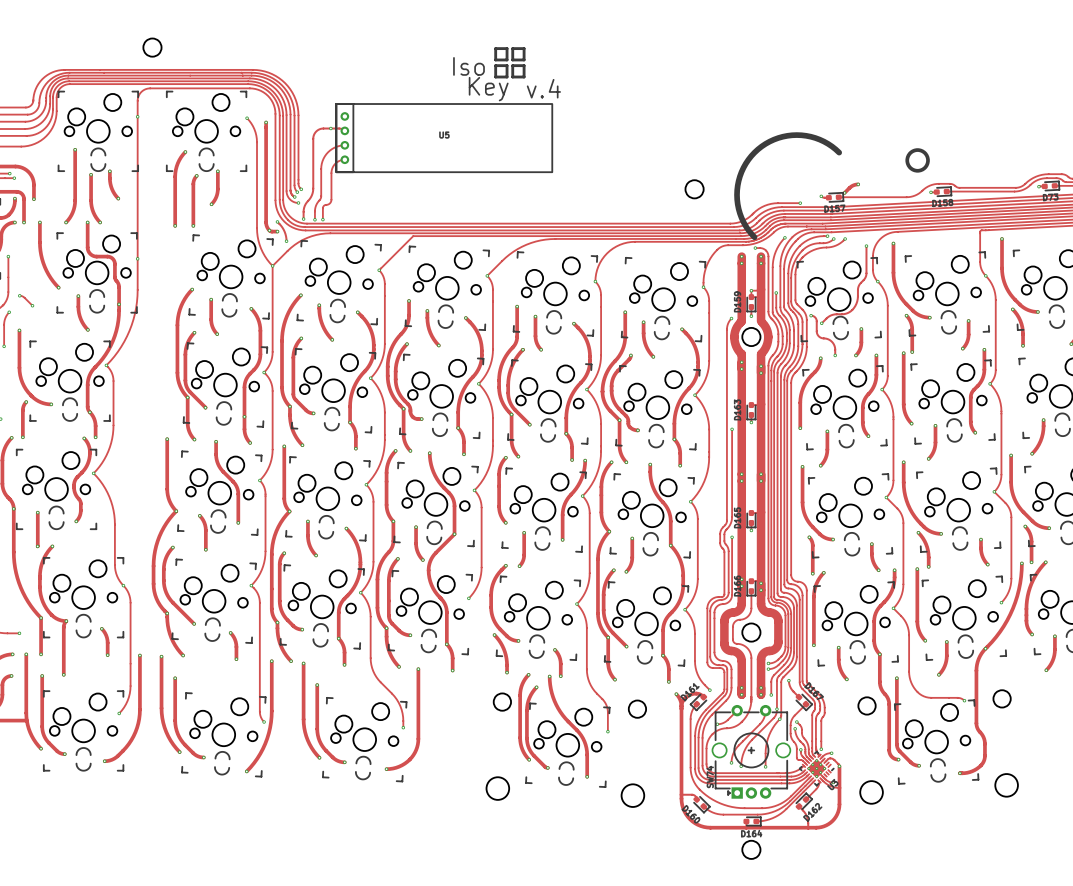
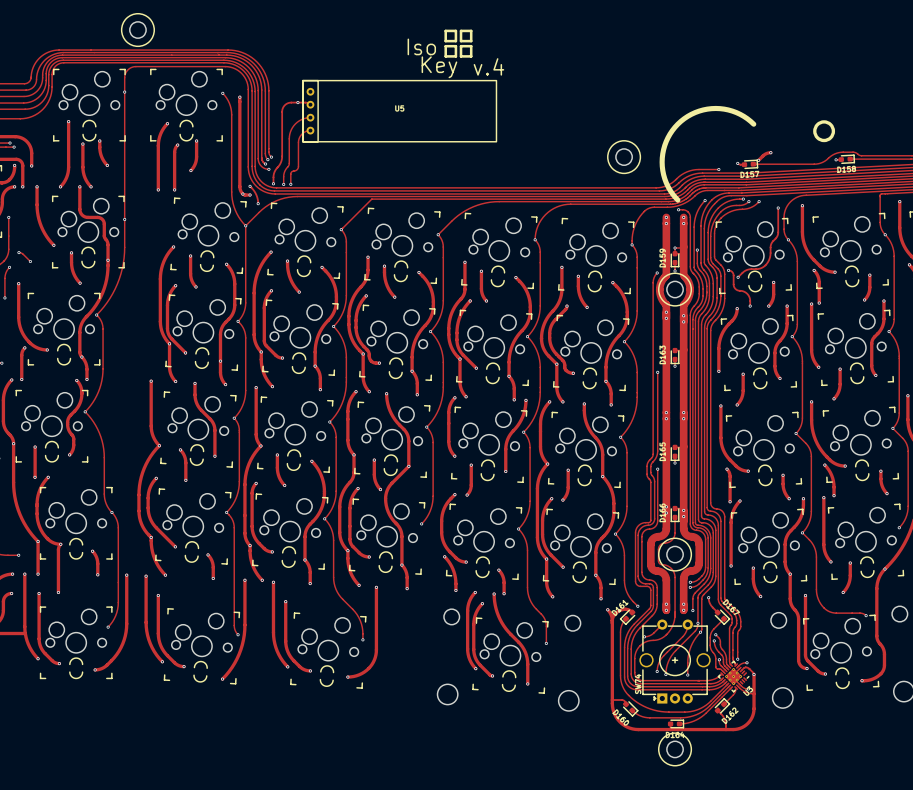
drawing: none -> [121, 13, 155, 47]
drawing: none -> [607, 140, 641, 174]
drawing: none -> [658, 272, 692, 307]
drawing: none -> [658, 537, 692, 572]
drawing: none -> [658, 732, 692, 767]

